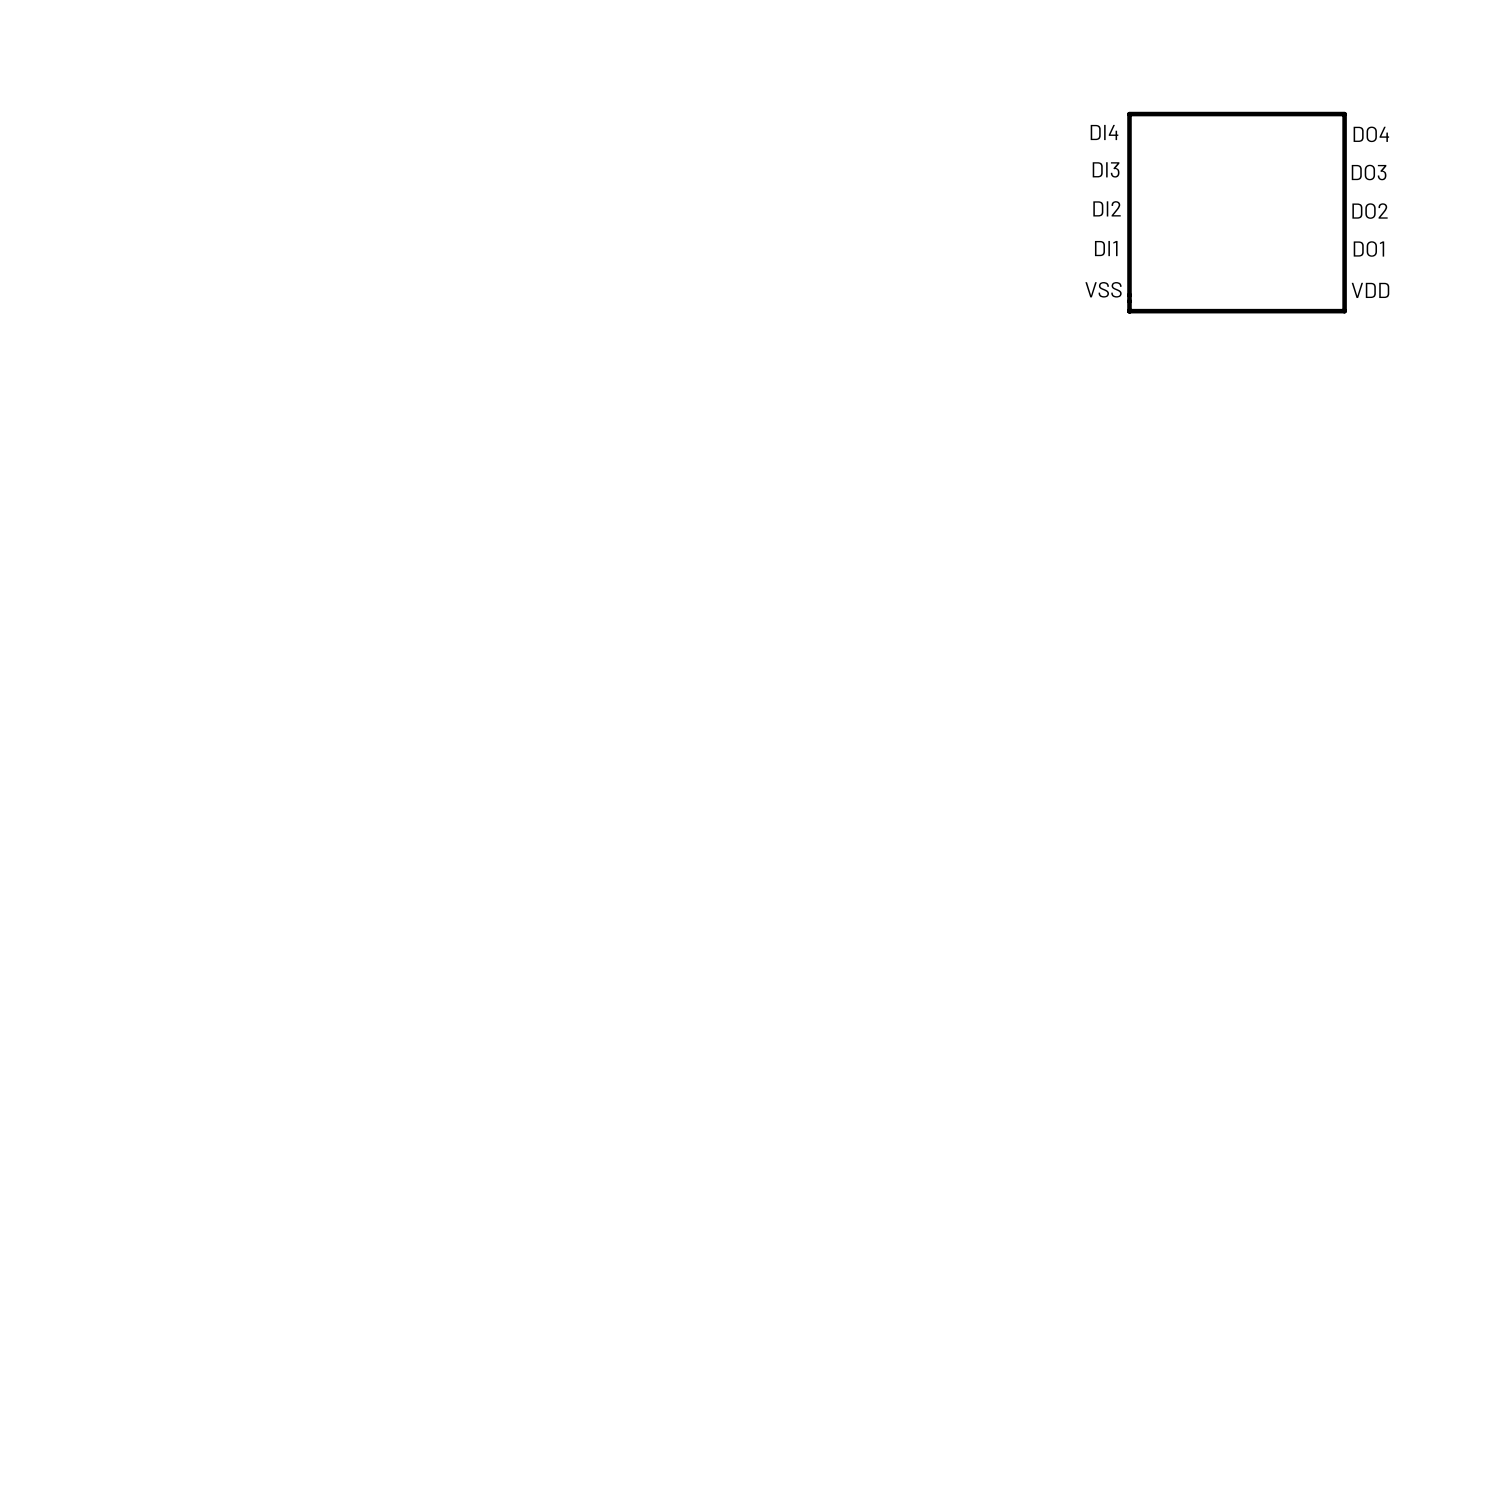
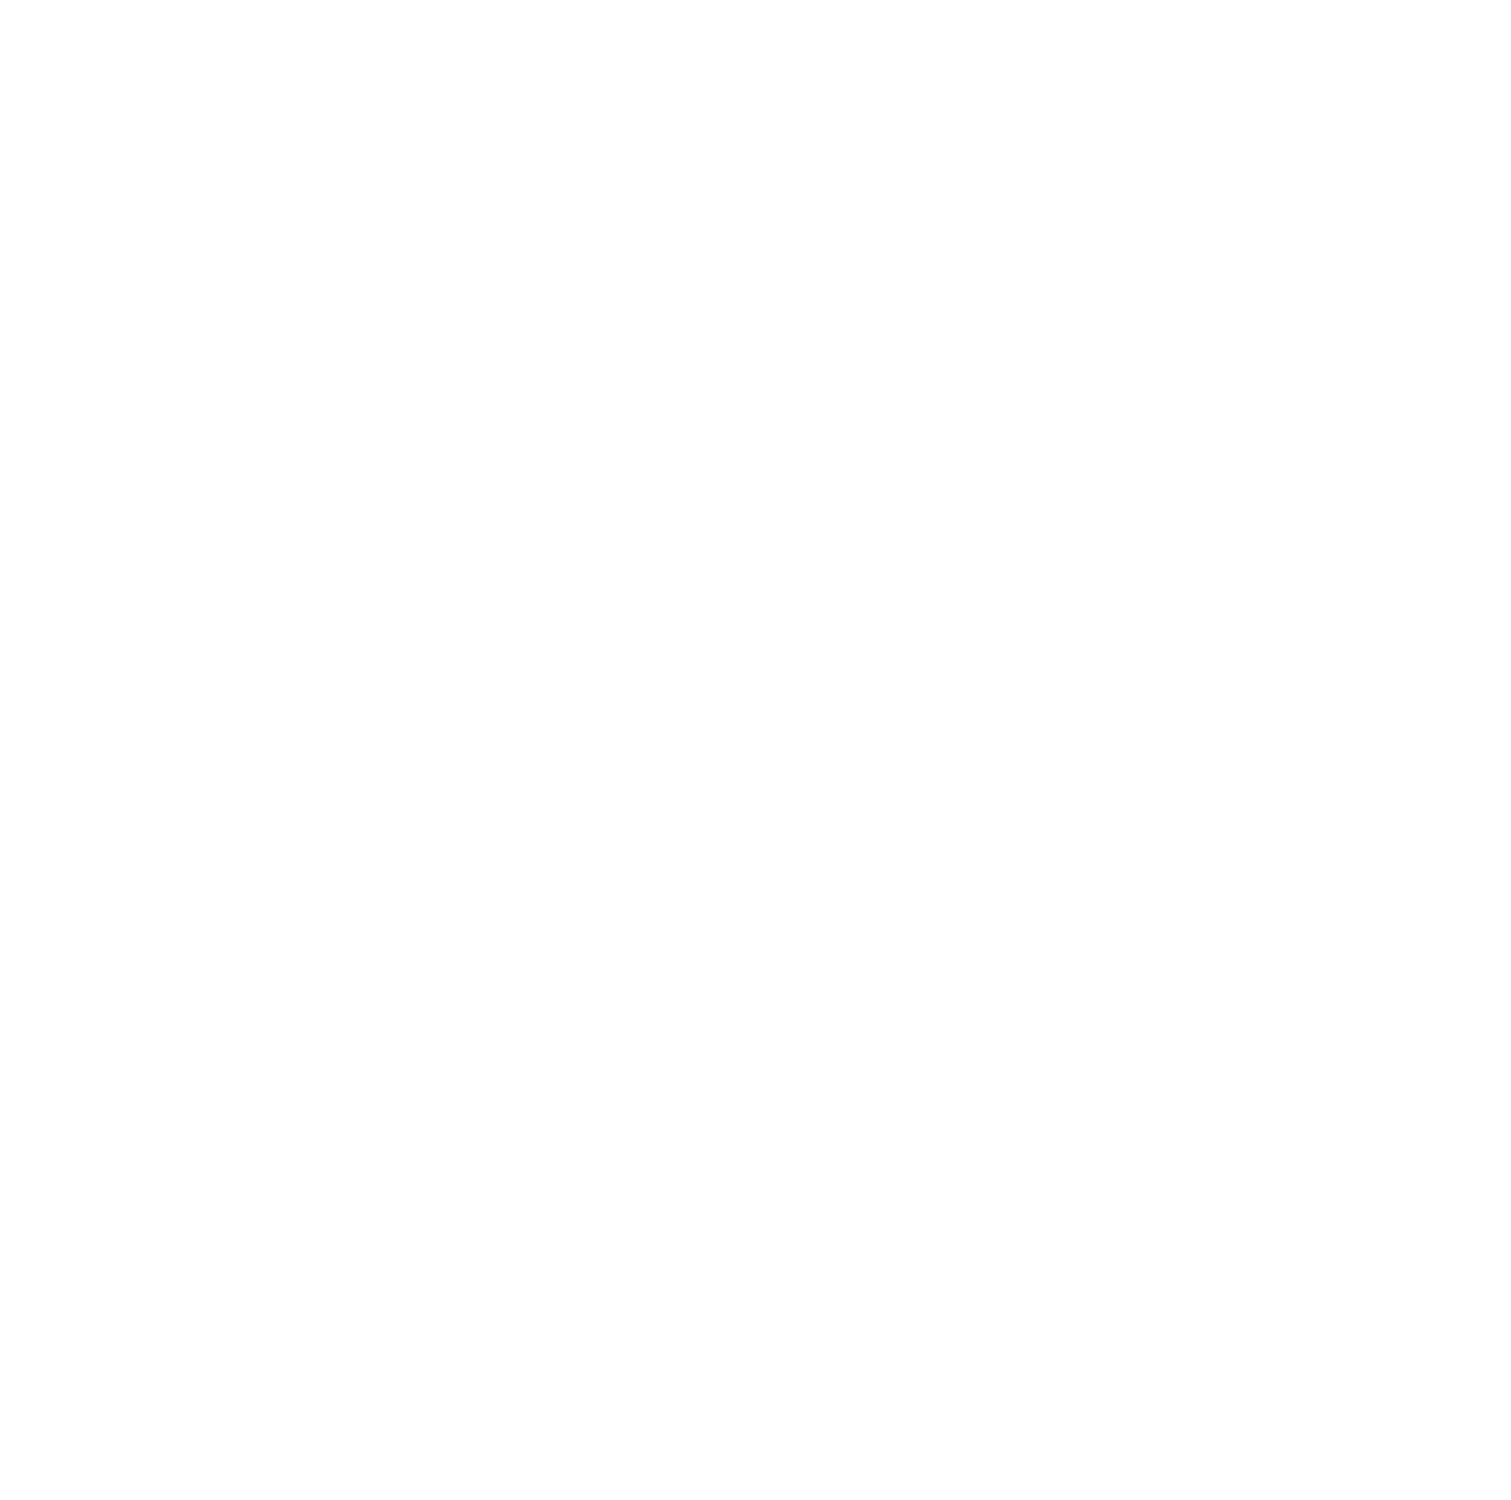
part: (1236, 212) -> none

